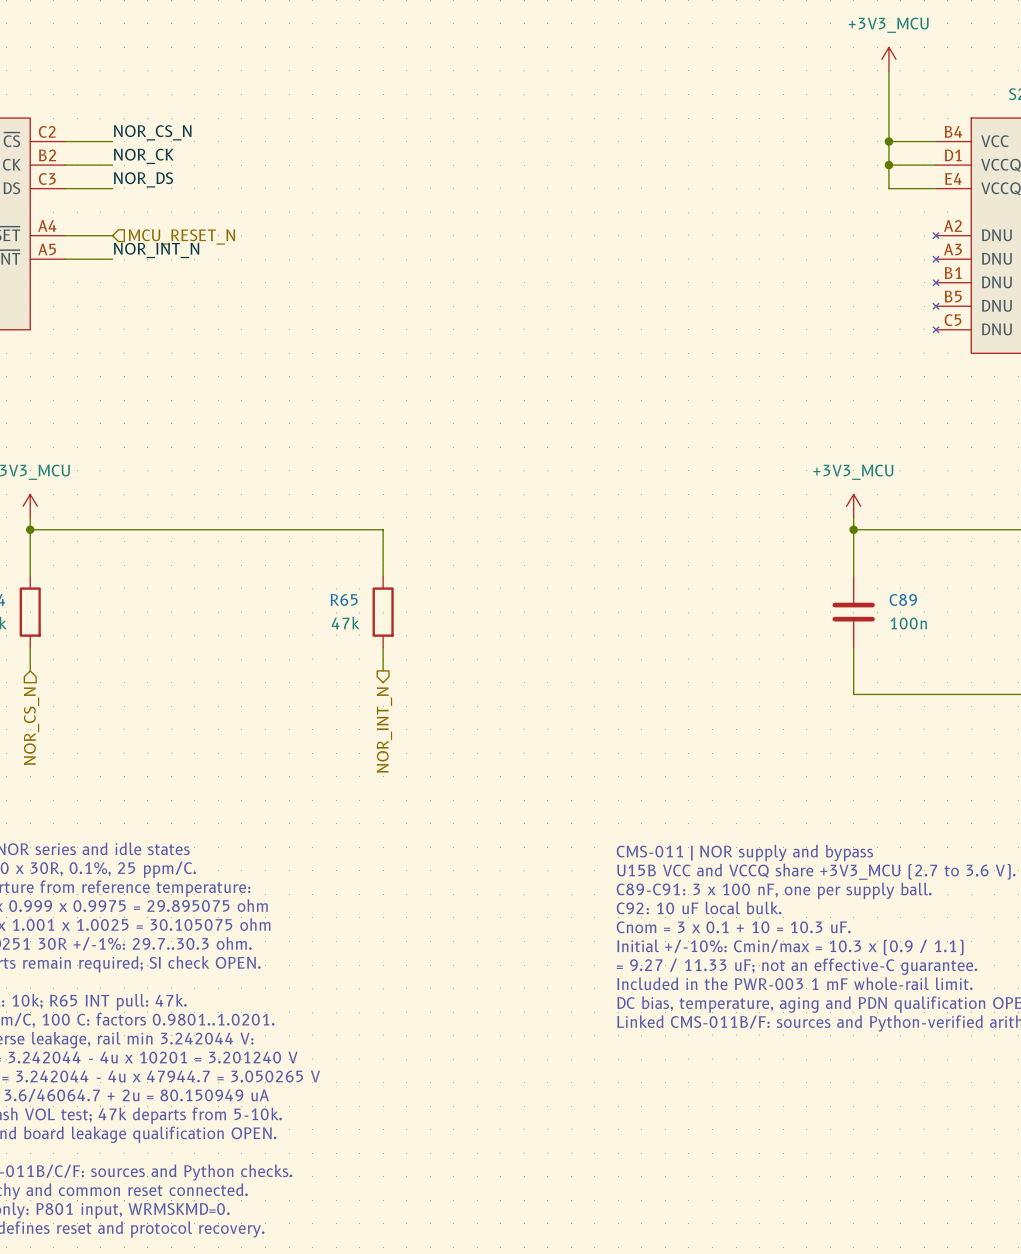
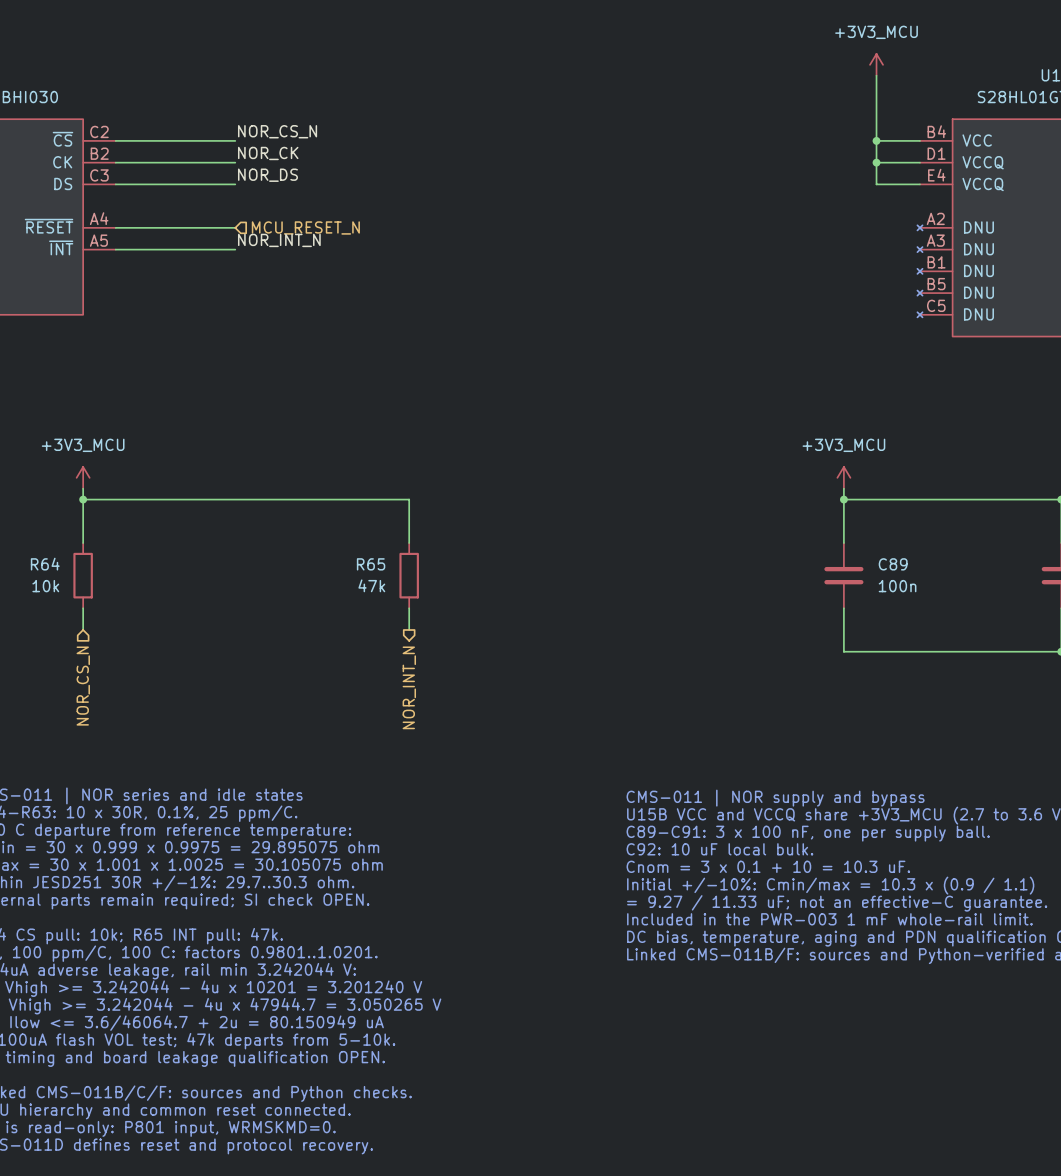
label position: NOR_CS_N (152, 132) -> NOR_CS_N (277, 131)
wire: none -> (159, 140) (235, 140)
label position: NOR_CK (143, 156) -> NOR_CK (268, 153)
wire: none -> (159, 162) (235, 162)
label position: NOR_DS (143, 179) -> NOR_DS (267, 175)
wire: none -> (159, 184) (235, 184)
wire: none -> (159, 227) (235, 227)
hierarchical label position: MCU_RESET_N (181, 236) -> MCU_RESET_N (305, 227)
label position: NOR_INT_N (156, 250) -> NOR_INT_N (279, 240)
wire: none -> (159, 249) (235, 249)

